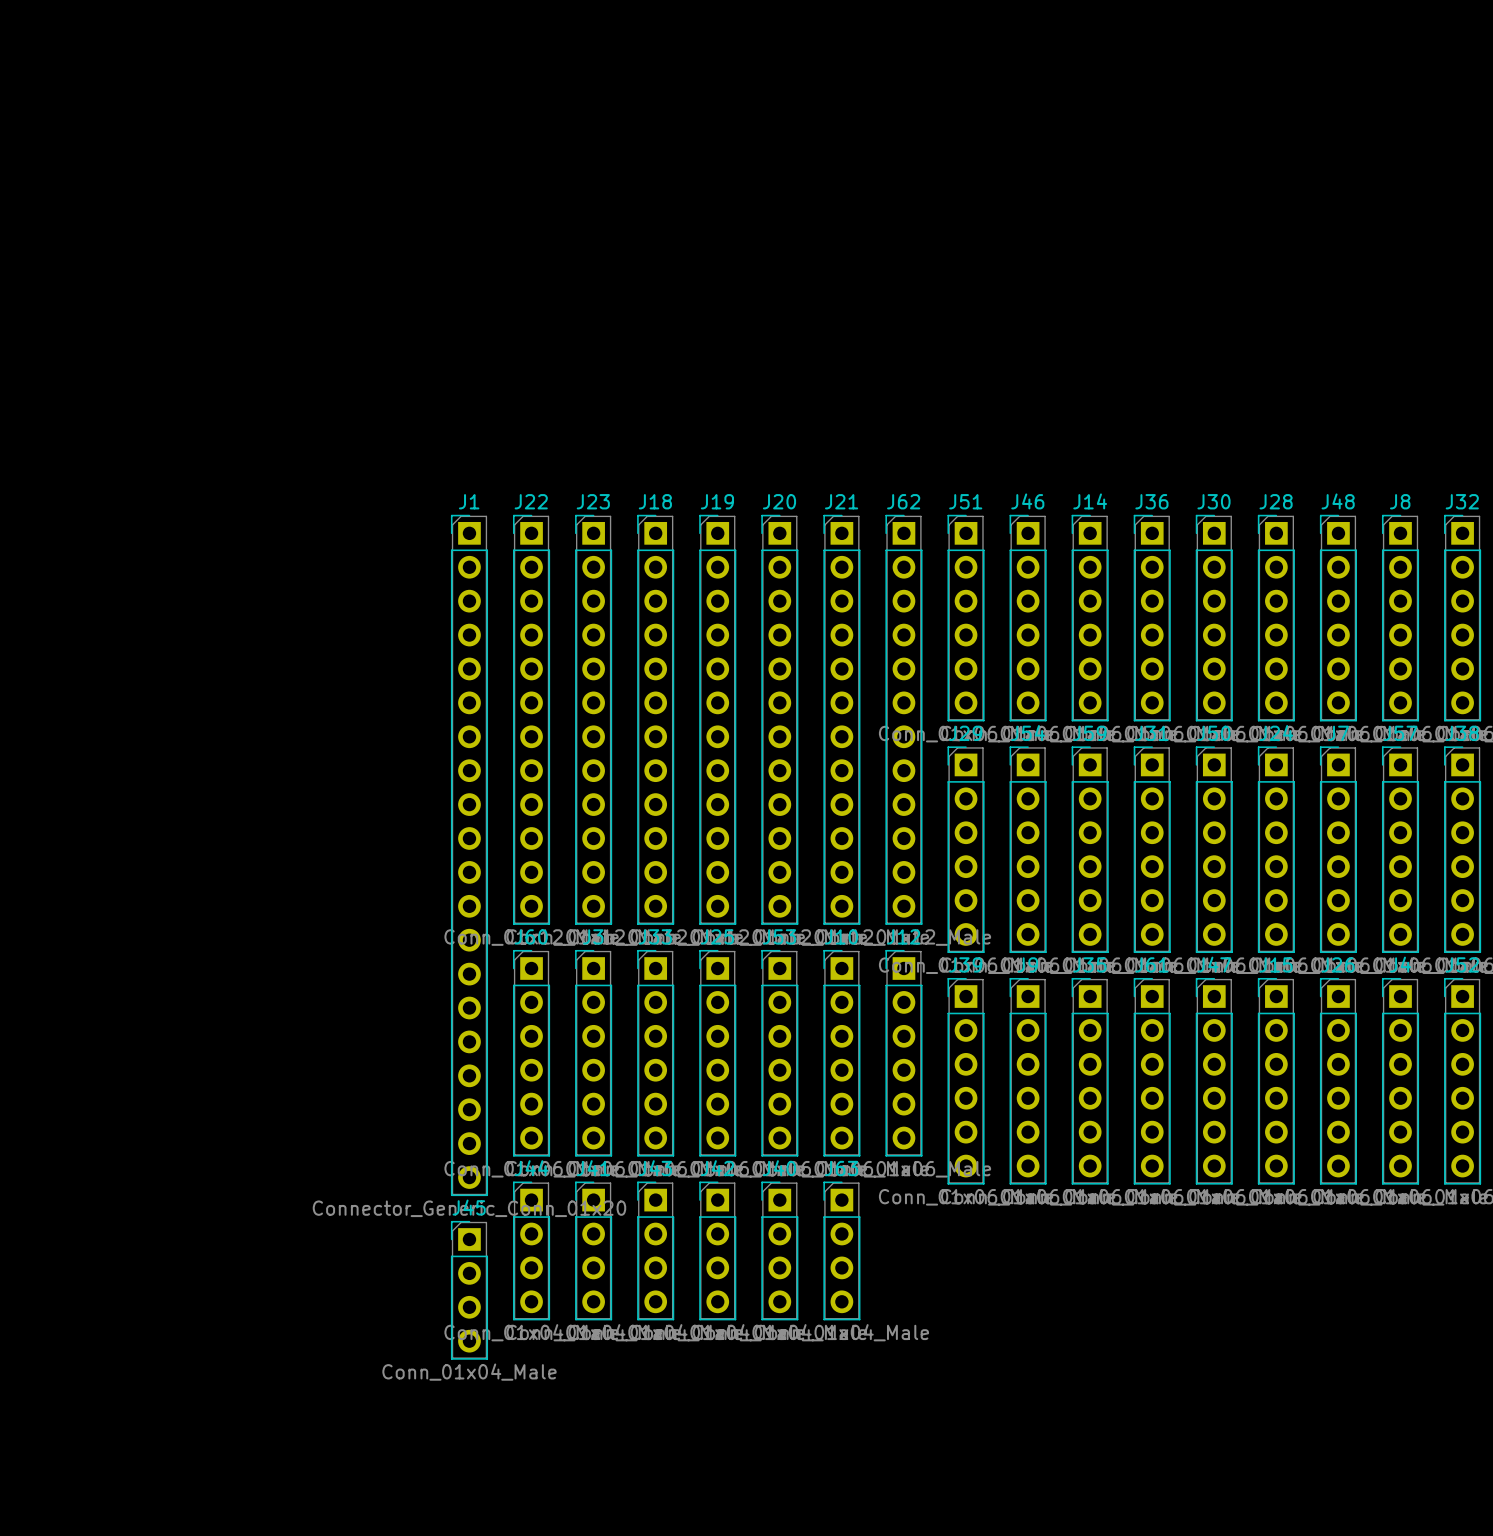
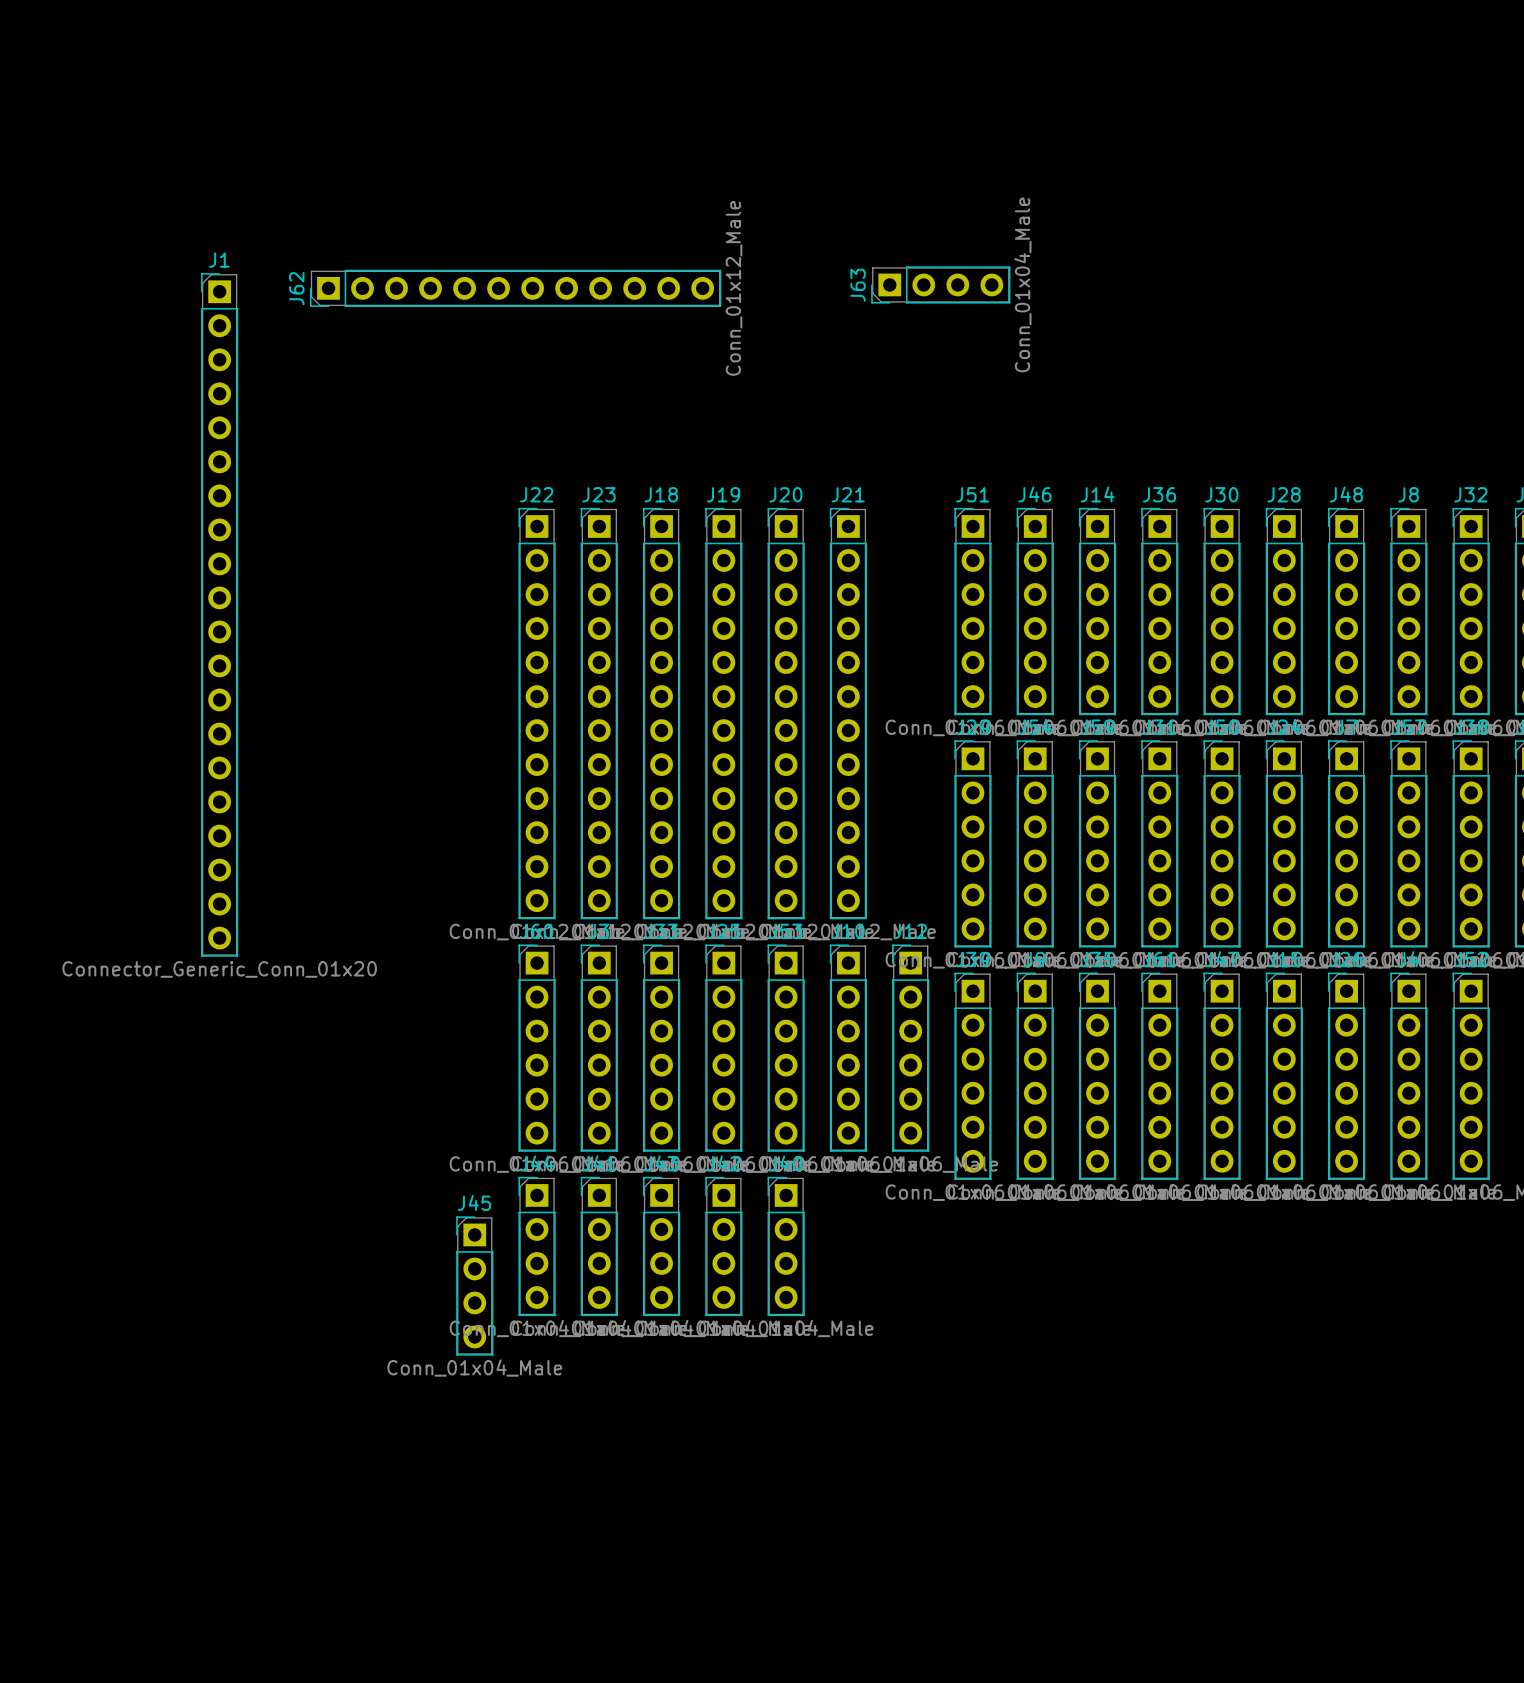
J62 rotation: 0° (903, 719) -> 90° counterclockwise (515, 288)
J62 position: (903, 719) -> (515, 288)
J1 position: (469, 855) -> (219, 614)
J63 rotation: 0° (841, 1250) -> 90° counterclockwise (940, 284)
J63 position: (841, 1250) -> (940, 284)

